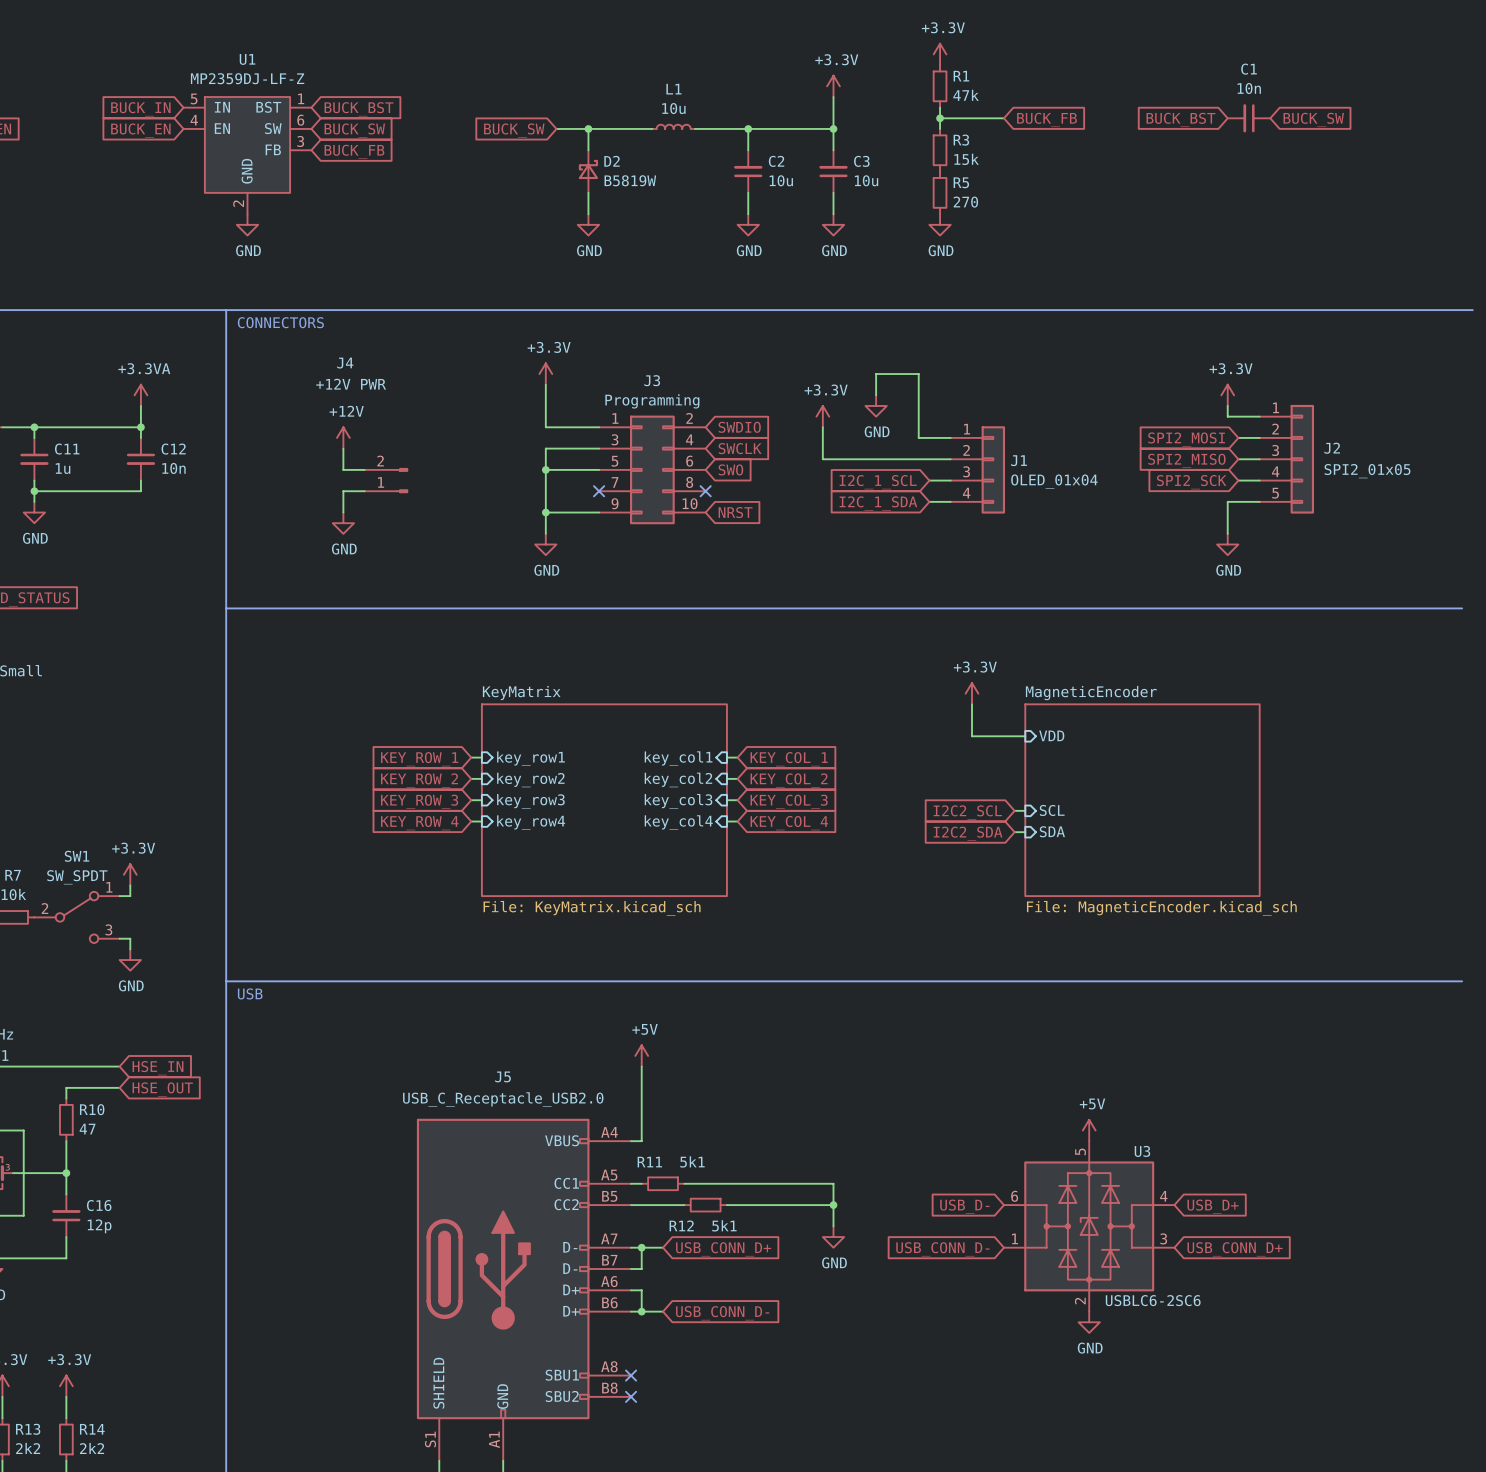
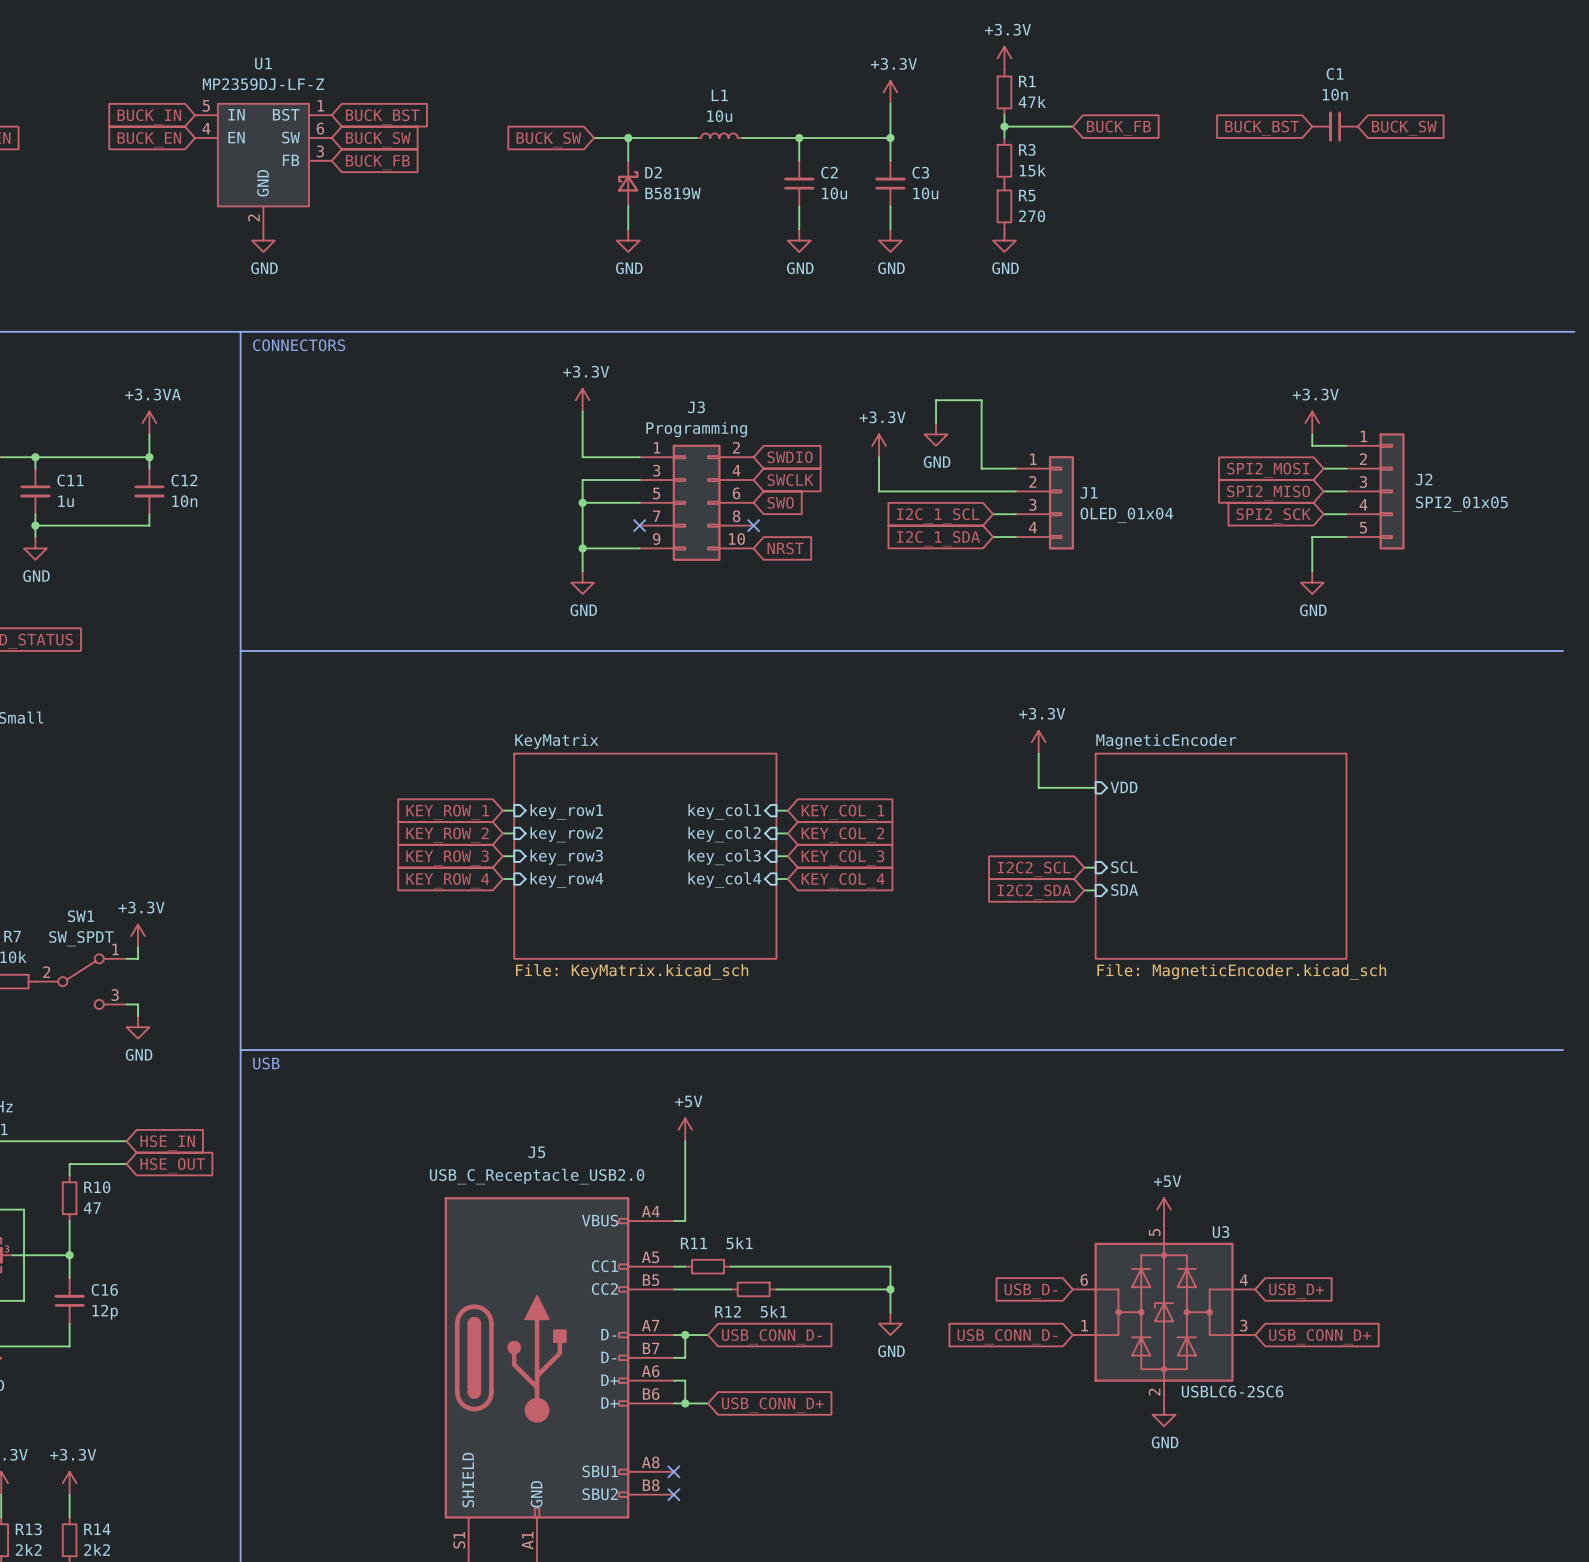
power symbol: +12V (343, 437) -> none
wire: (343, 448) (343, 469) (364, 469) -> none
J4: +12V PWR (386, 480) -> none
wire: (364, 491) (343, 491) (343, 512) -> none
power symbol: GND (343, 523) -> none
global label: USB_CONN_D+ (723, 1249) -> USB_CONN_D- (771, 1336)
global label: USB_CONN_D- (722, 1313) -> USB_CONN_D+ (772, 1405)

